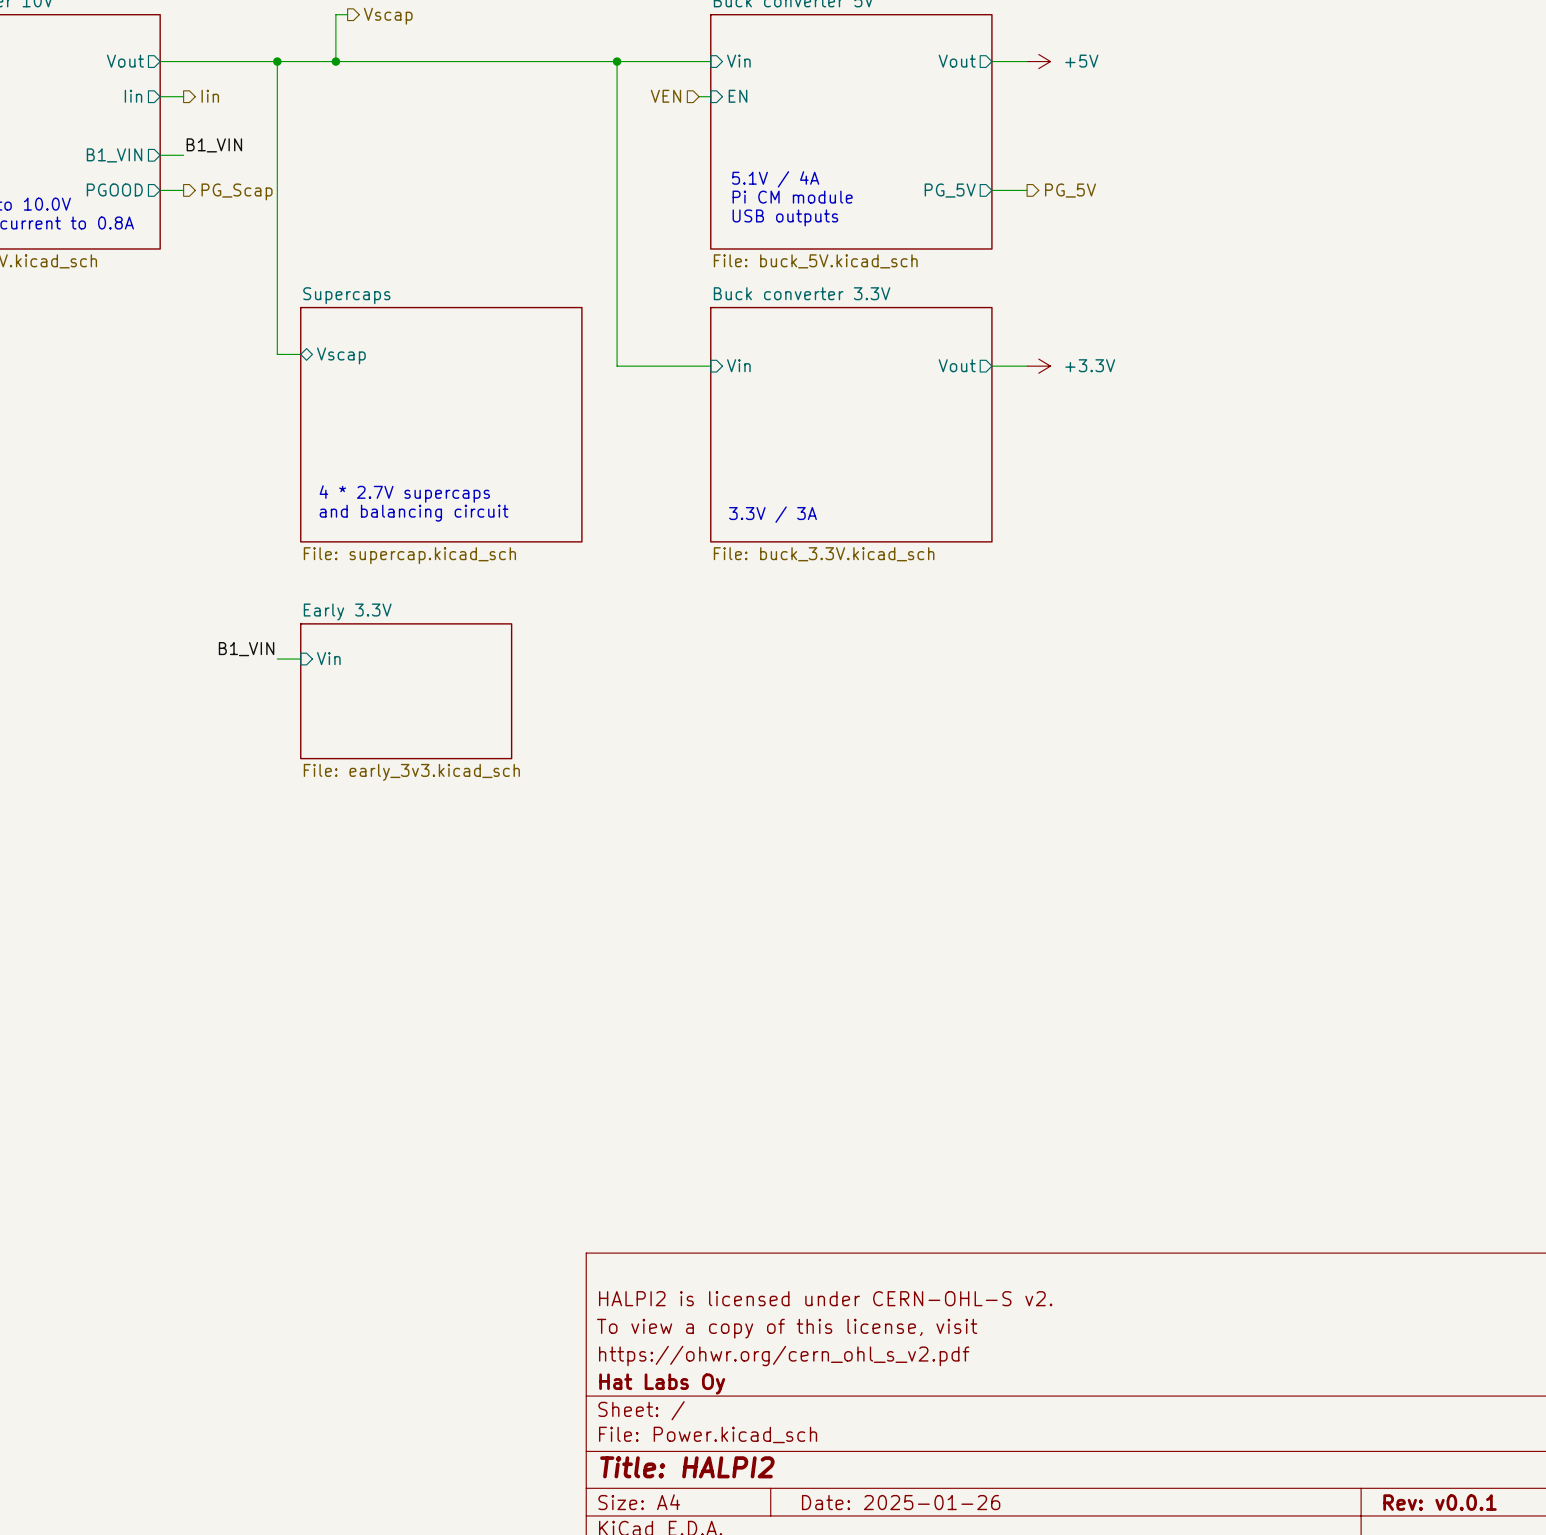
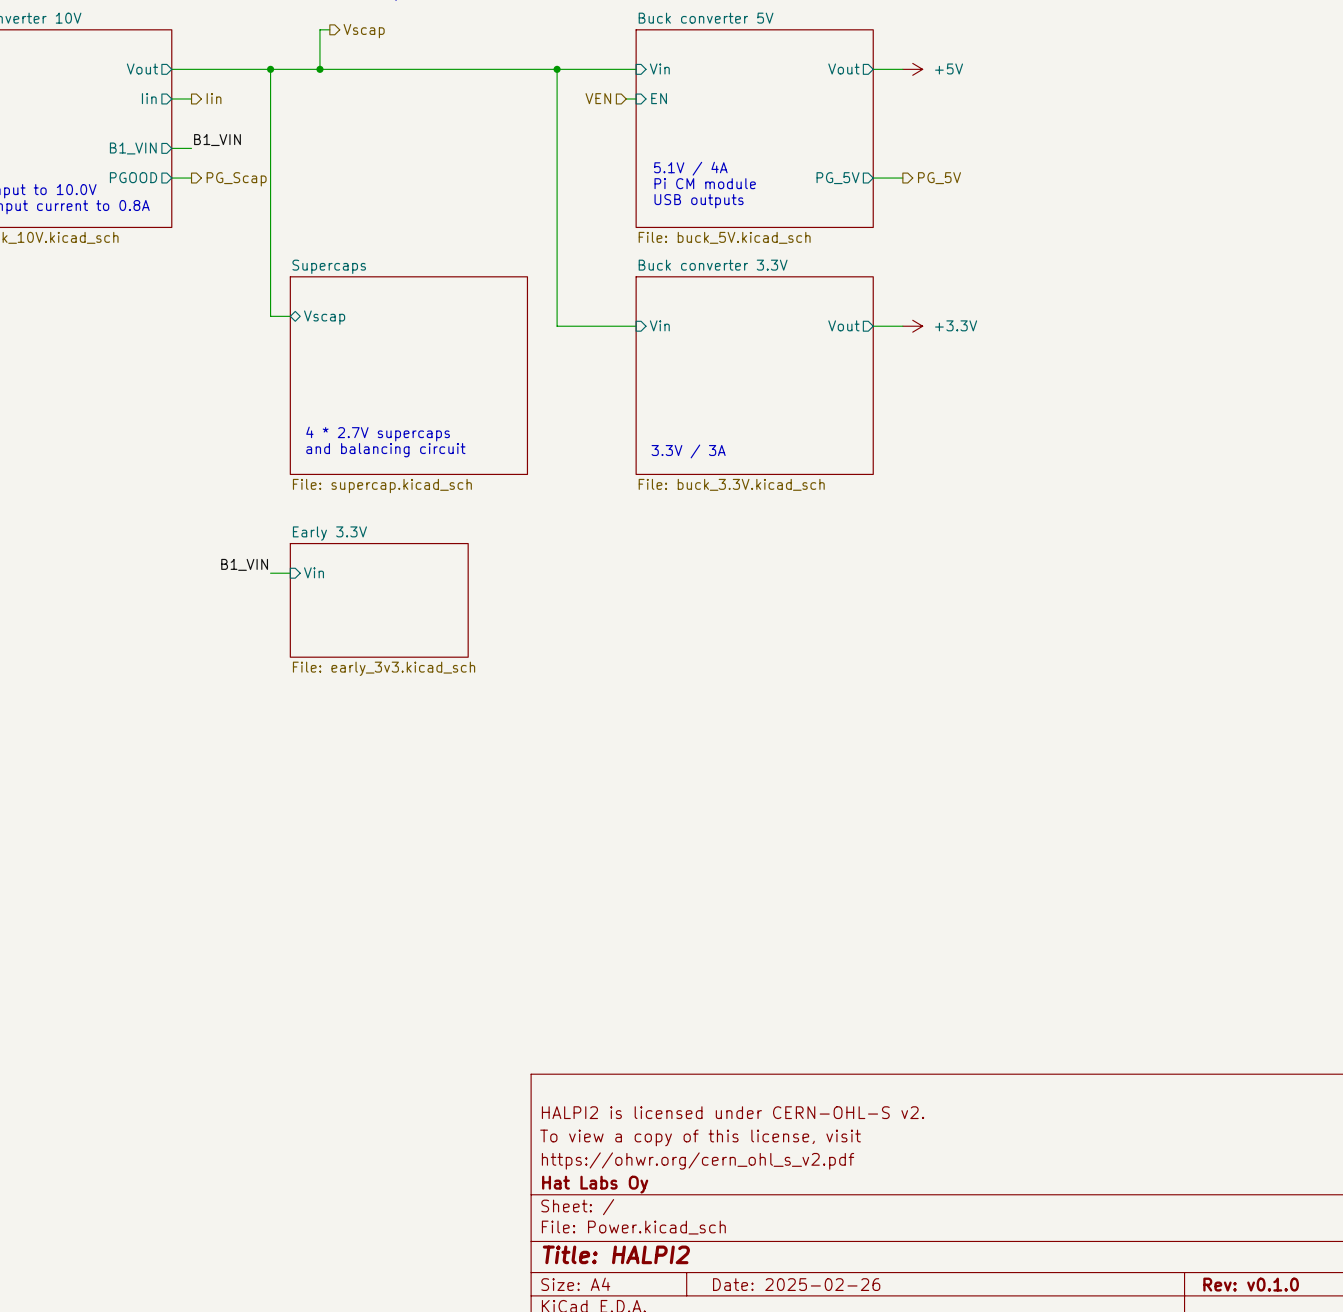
title block: Date: 2025-01-26 (901, 1502) -> Date: 2025-02-26 (796, 1284)
title block: Rev: v0.0.1 (1440, 1502) -> Rev: v0.1.0 (1251, 1284)

